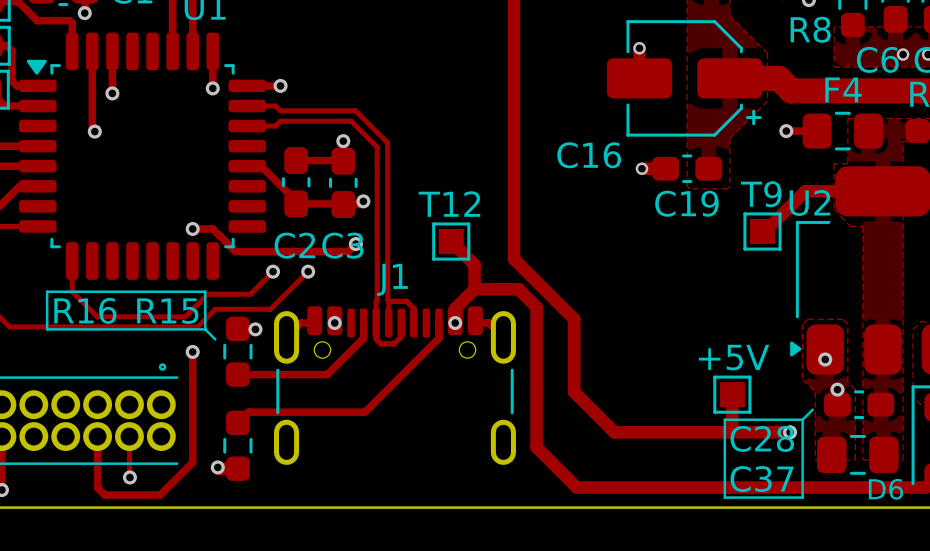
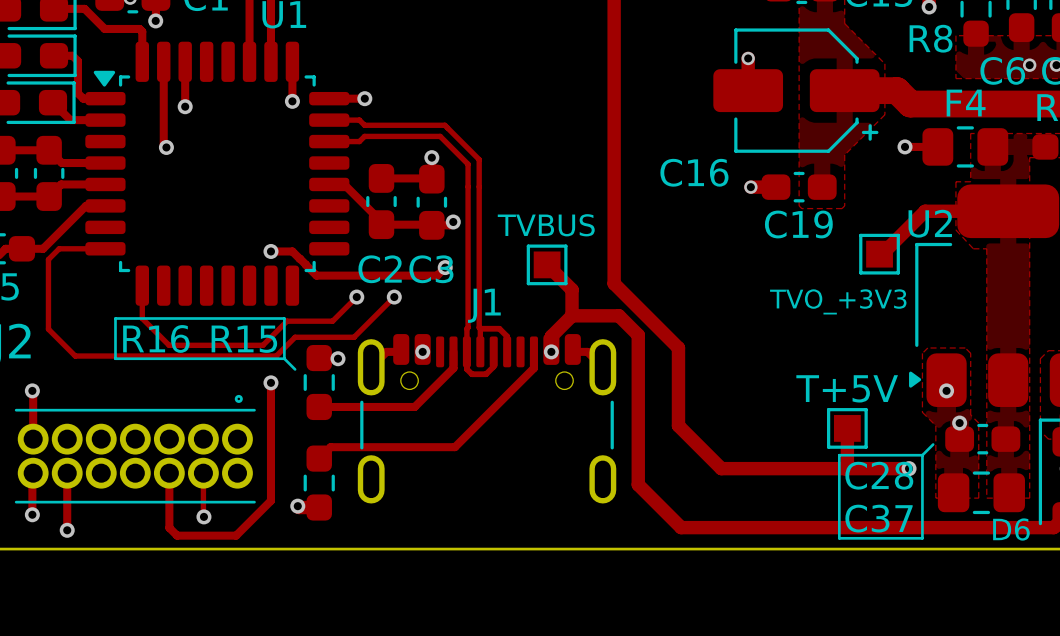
T9 name: T9 (761, 194) -> TVO_+3V3 (838, 301)
T12 name: T12 (449, 204) -> TVBUS (546, 225)
+5V name: +5V (734, 357) -> T+5V (847, 388)

